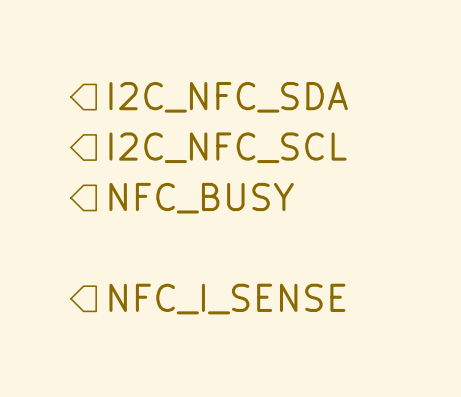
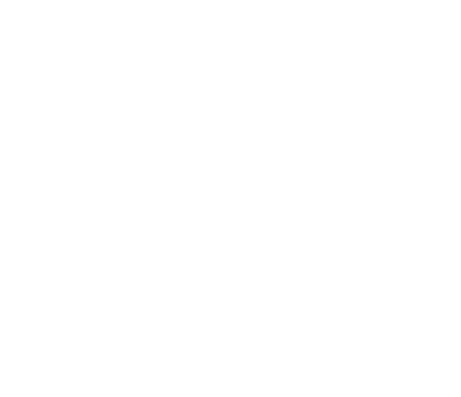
hierarchical label: I2C_NFC_SDA (228, 97) -> none
hierarchical label: I2C_NFC_SCL (228, 147) -> none
hierarchical label: NFC_BUSY (201, 198) -> none
hierarchical label: NFC_I_SENSE (227, 299) -> none

